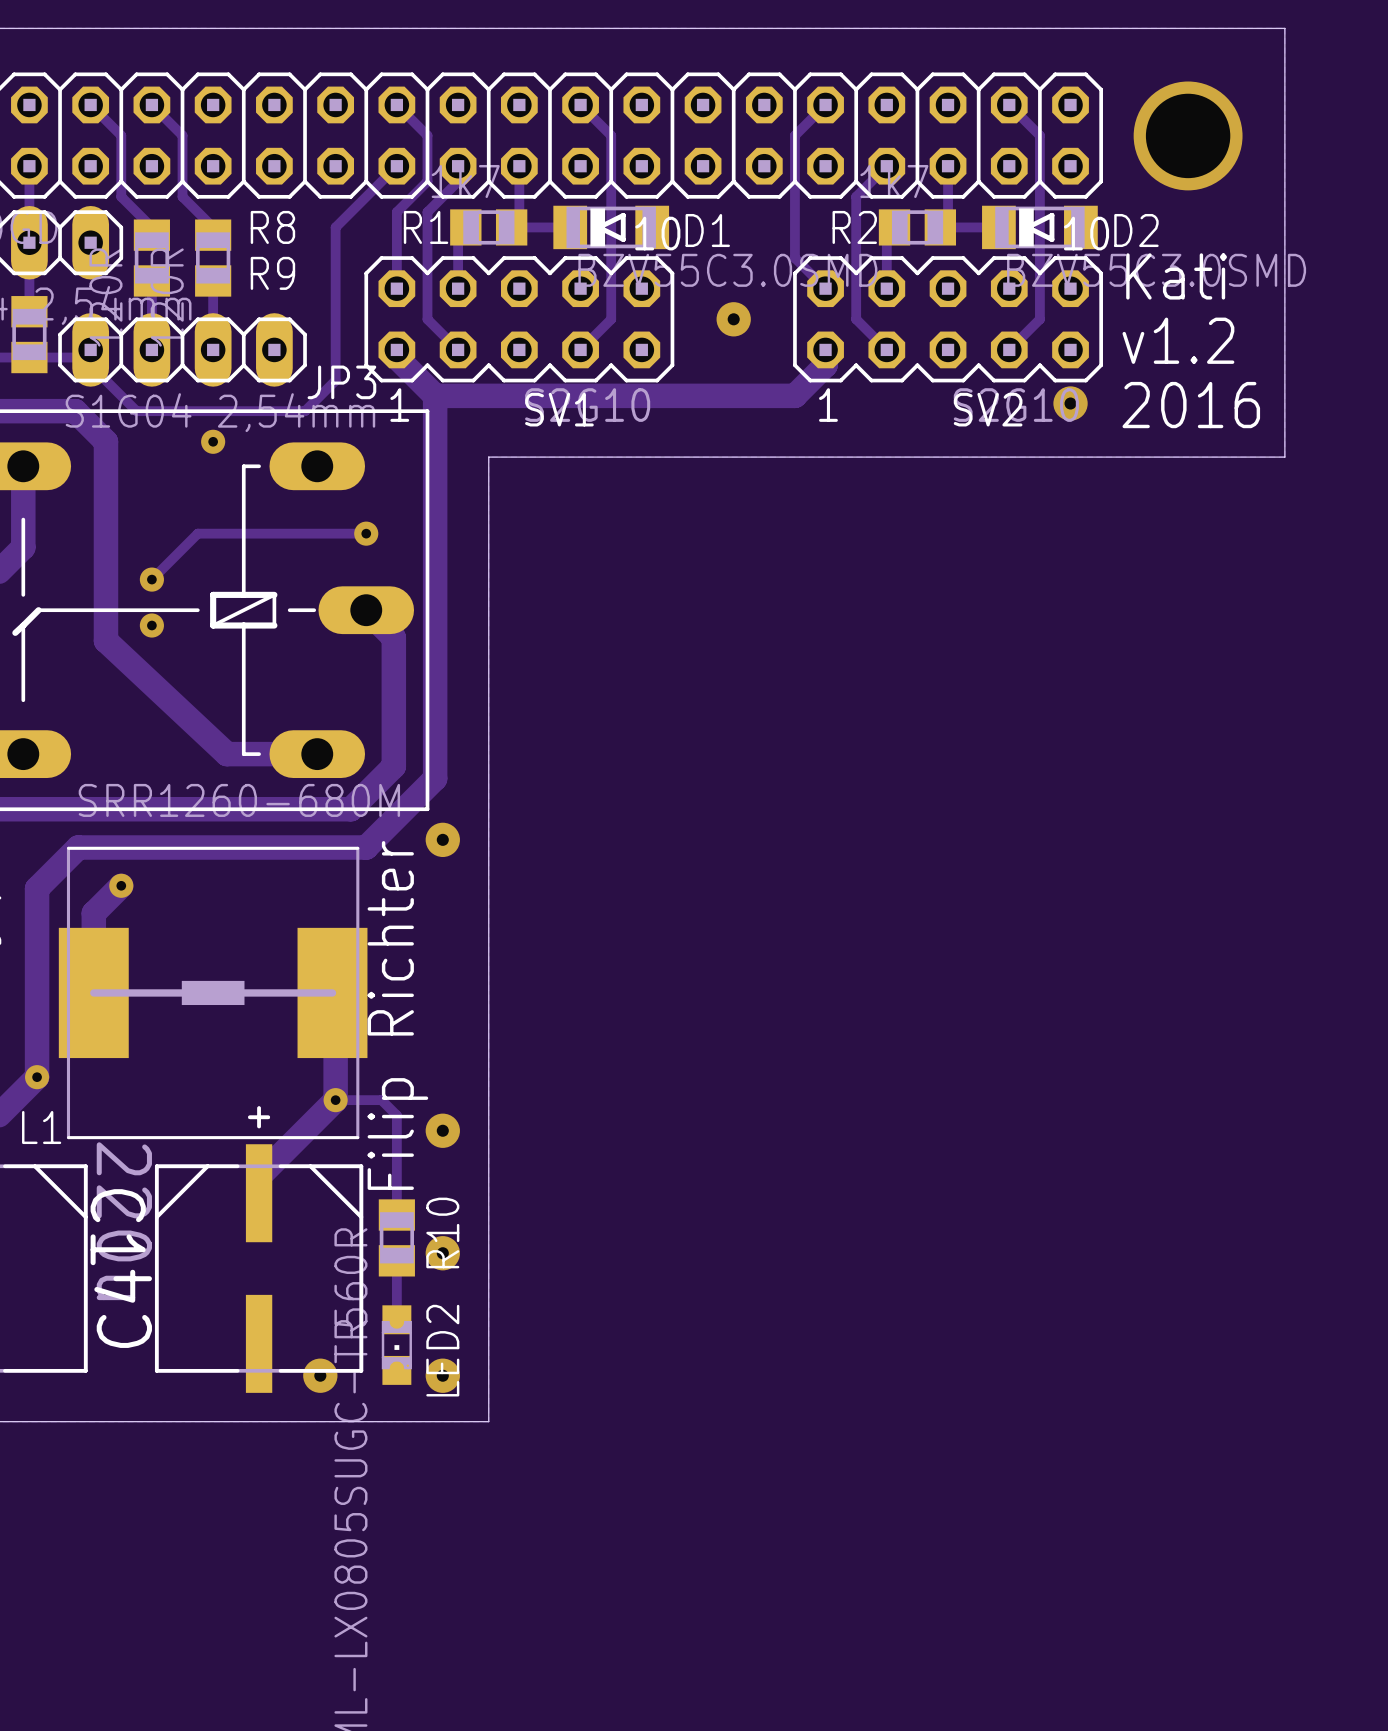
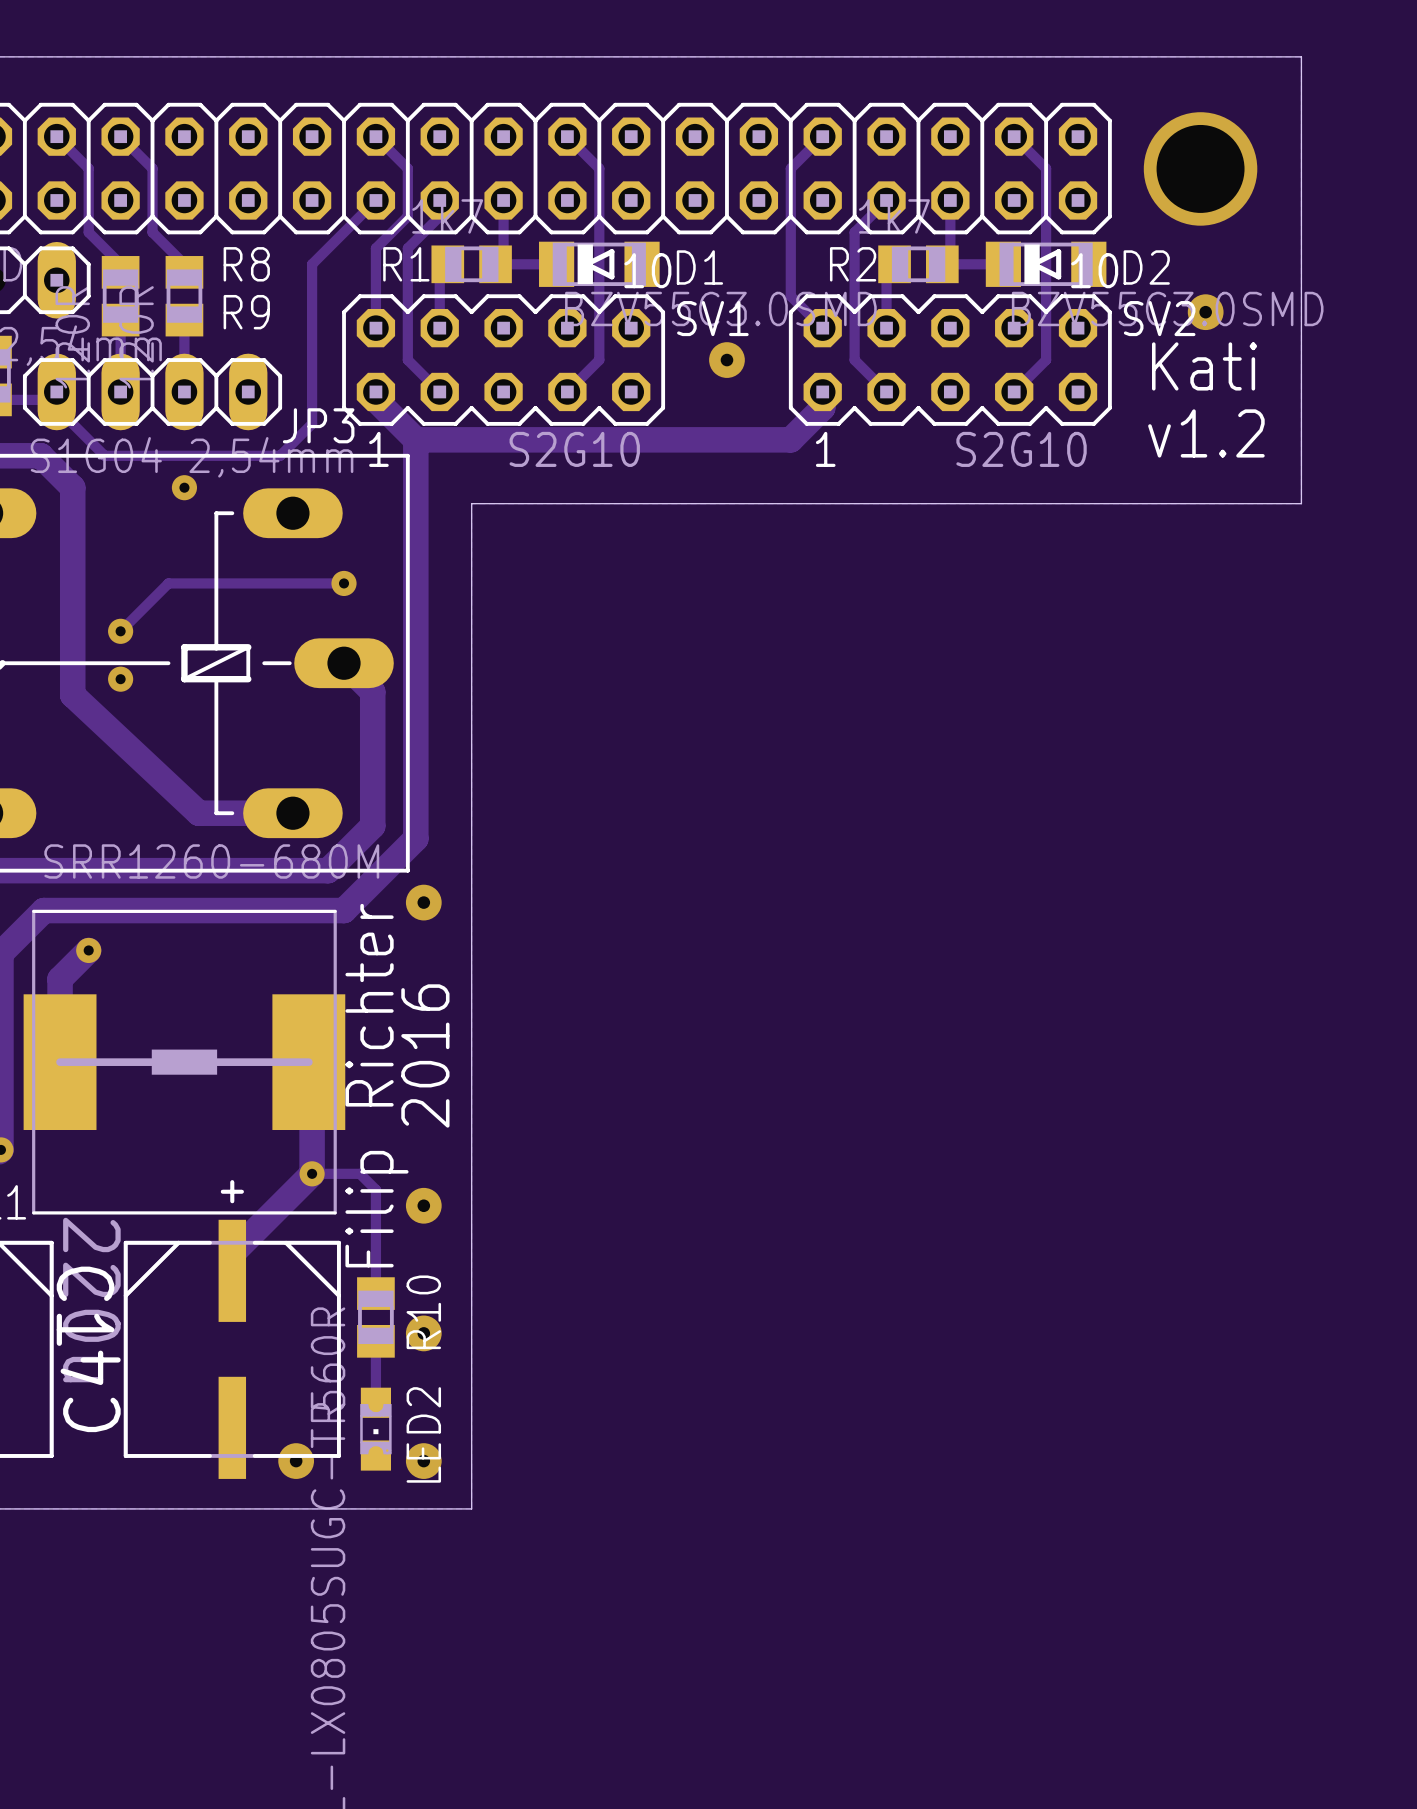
via: none -> (1205, 312)
text position: Kati (1176, 276) -> Kati (1204, 366)
text position: v1.2 (1178, 340) -> v1.2 (1206, 433)
via: (1070, 403) -> none
text: 2016 (1191, 405) -> none
SV1 name position: SV1 (559, 409) -> SV1 (712, 318)
SV2 name position: SV2 (988, 409) -> SV2 (1159, 318)
text: none -> 2016 (425, 1055)

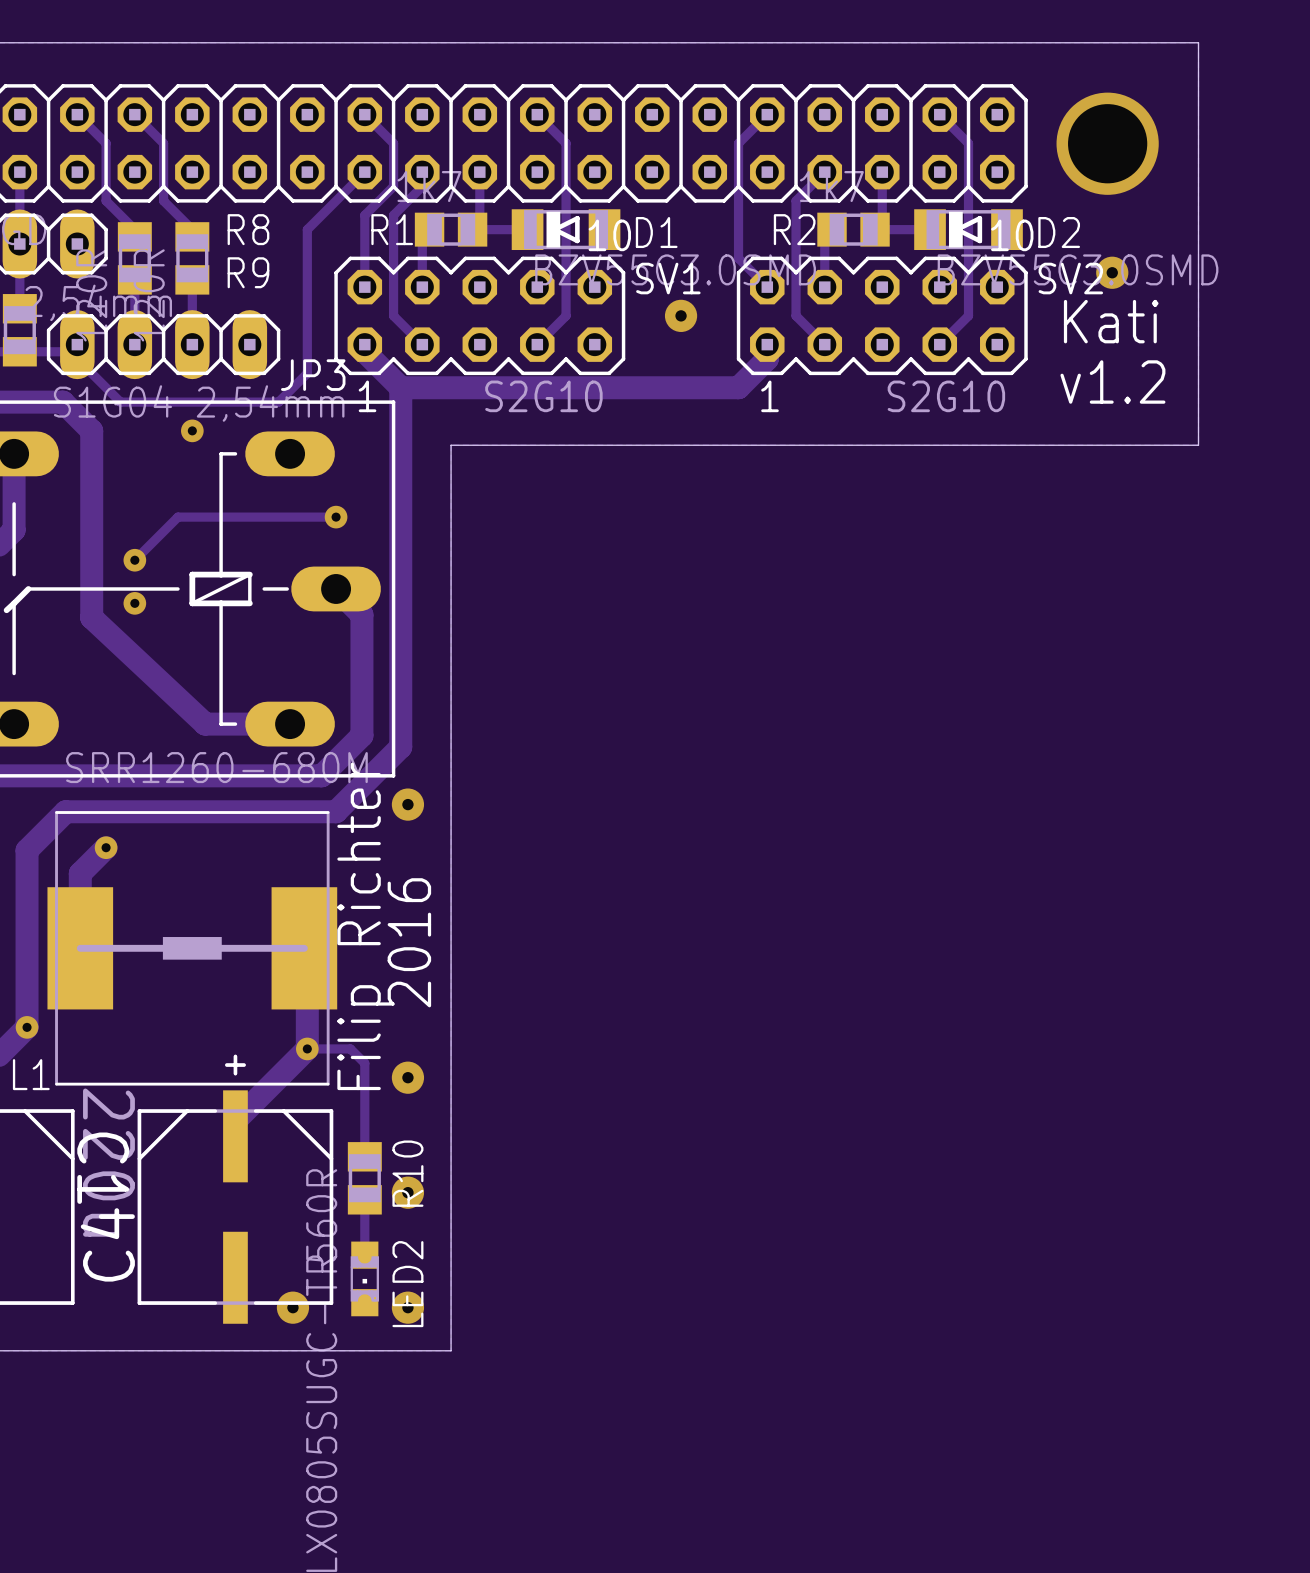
text position: Filip Richter (376, 1085) -> Filip Richter (365, 926)

